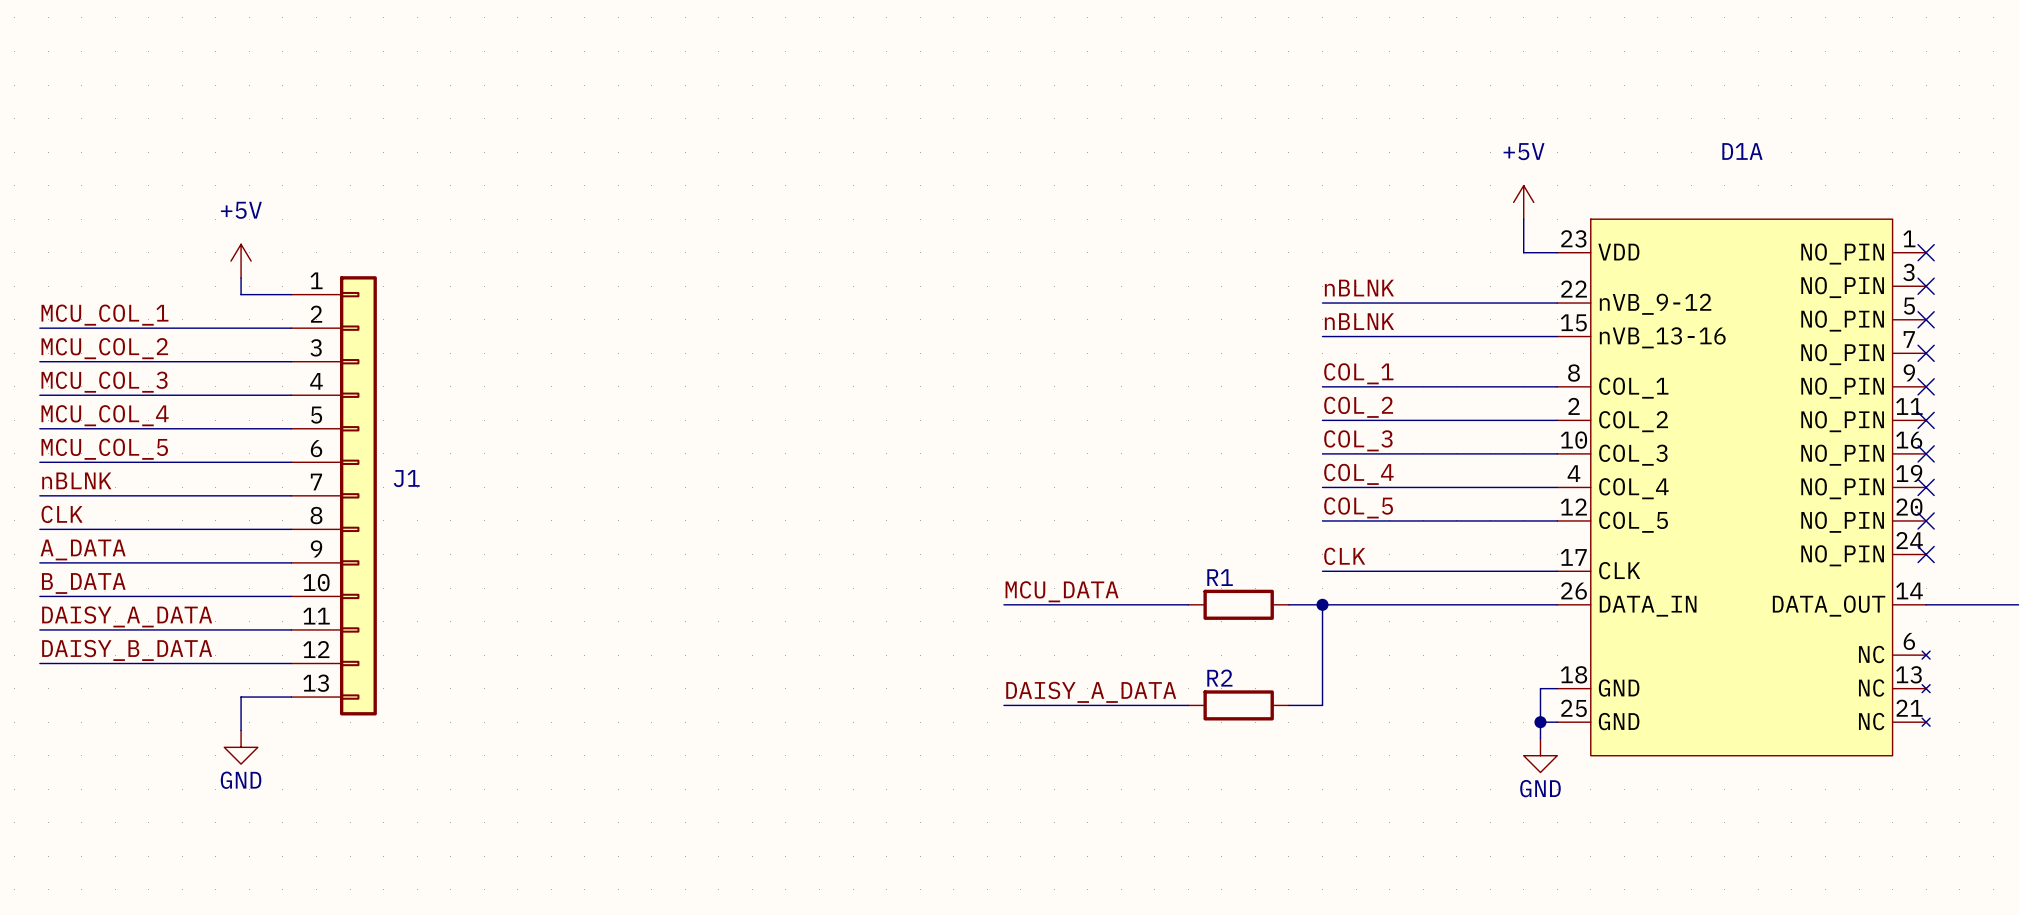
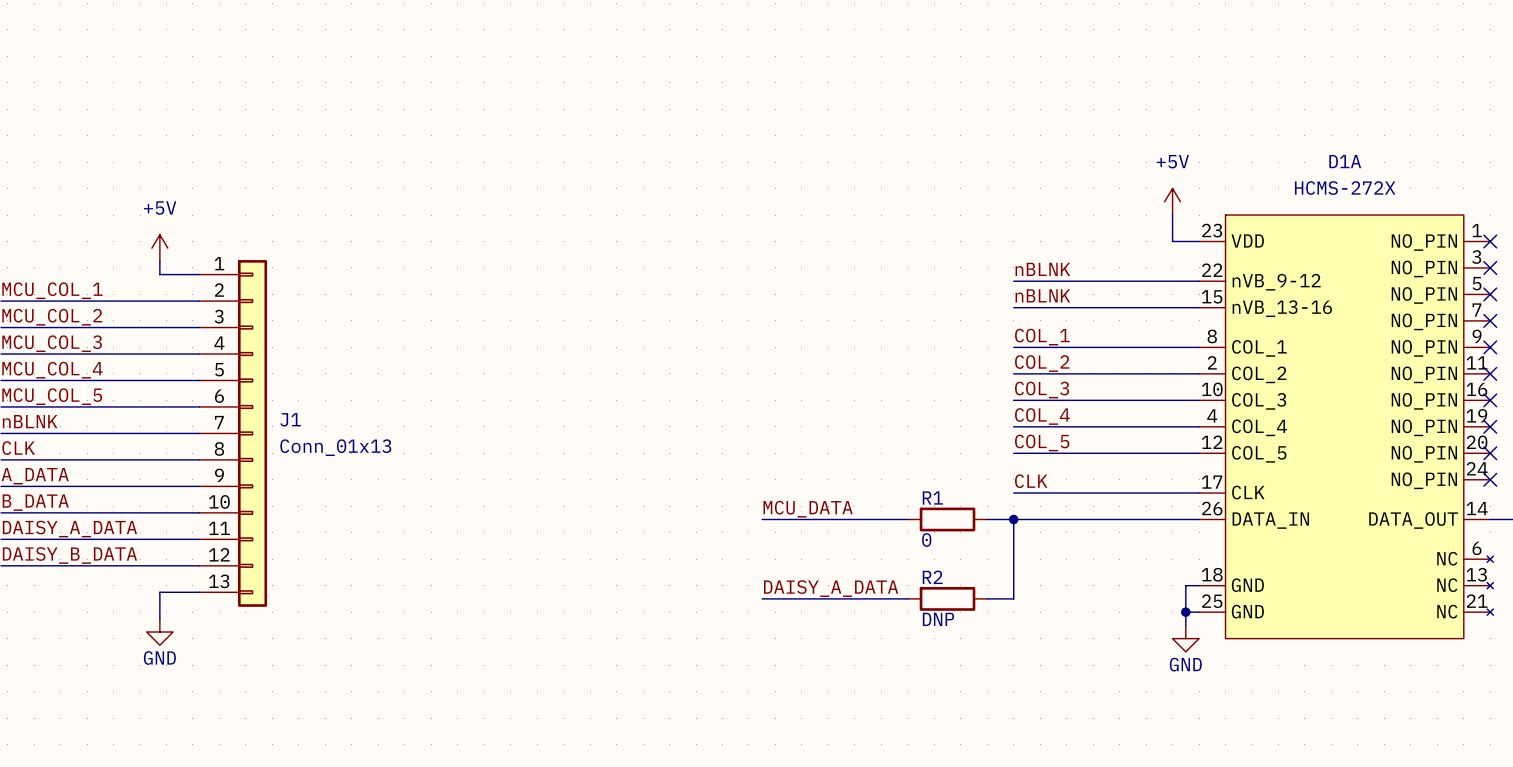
D1A value: none -> HCMS-272X (1345, 188)
J1 value: none -> Conn_01x13 (335, 447)
R1 value: none -> 0 (926, 539)
R2 value: none -> DNP (938, 619)

